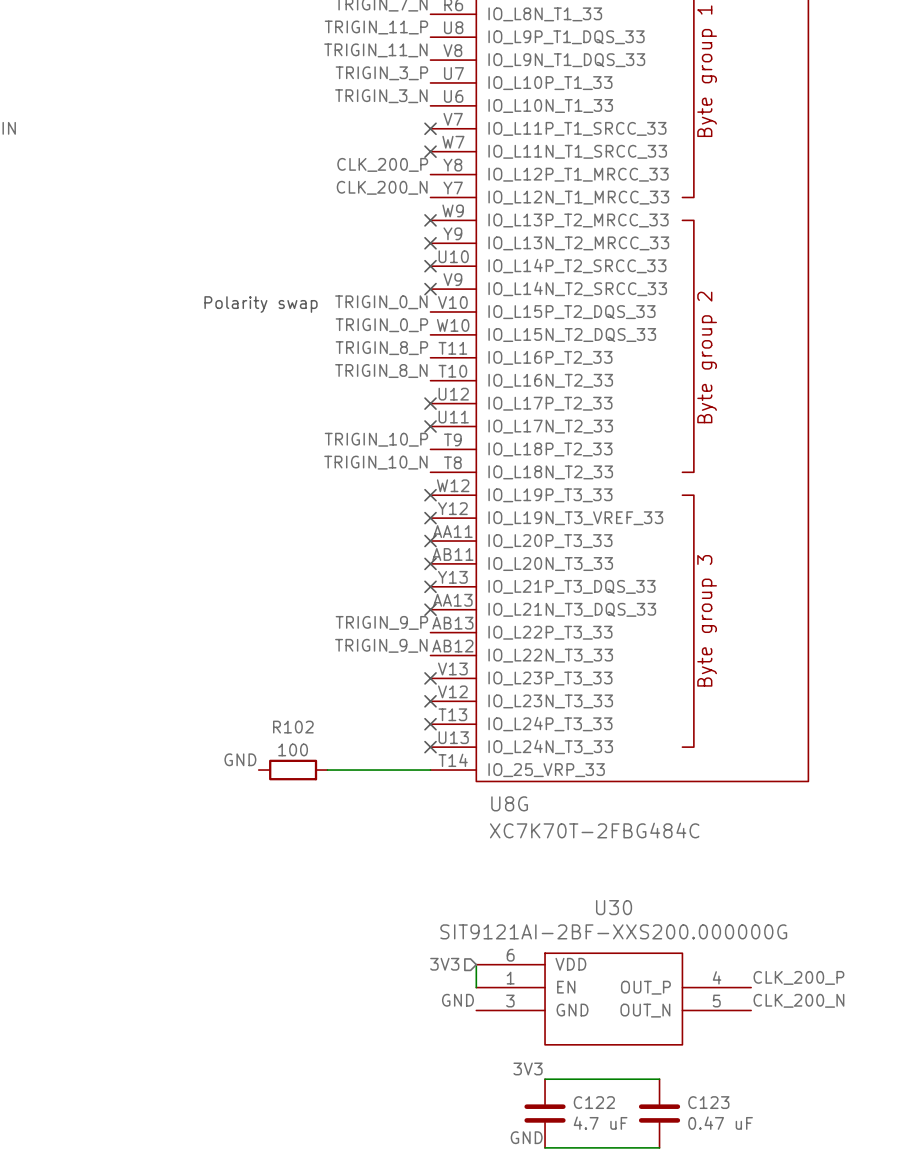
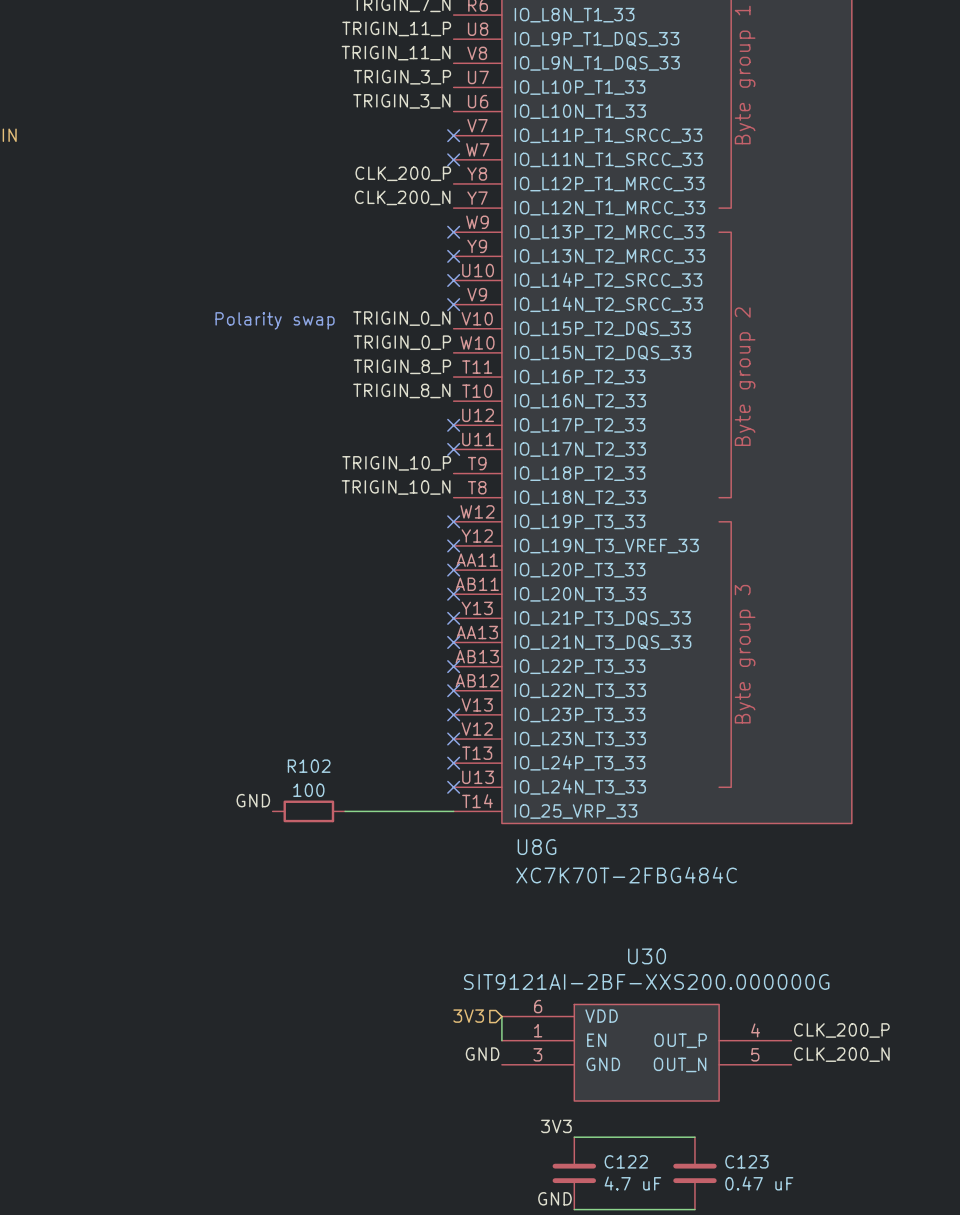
label: TRIGIN_9_P (381, 622) -> none
no-connect mark: none -> (453, 666)
label: TRIGIN_9_N (381, 645) -> none
no-connect mark: none -> (453, 690)

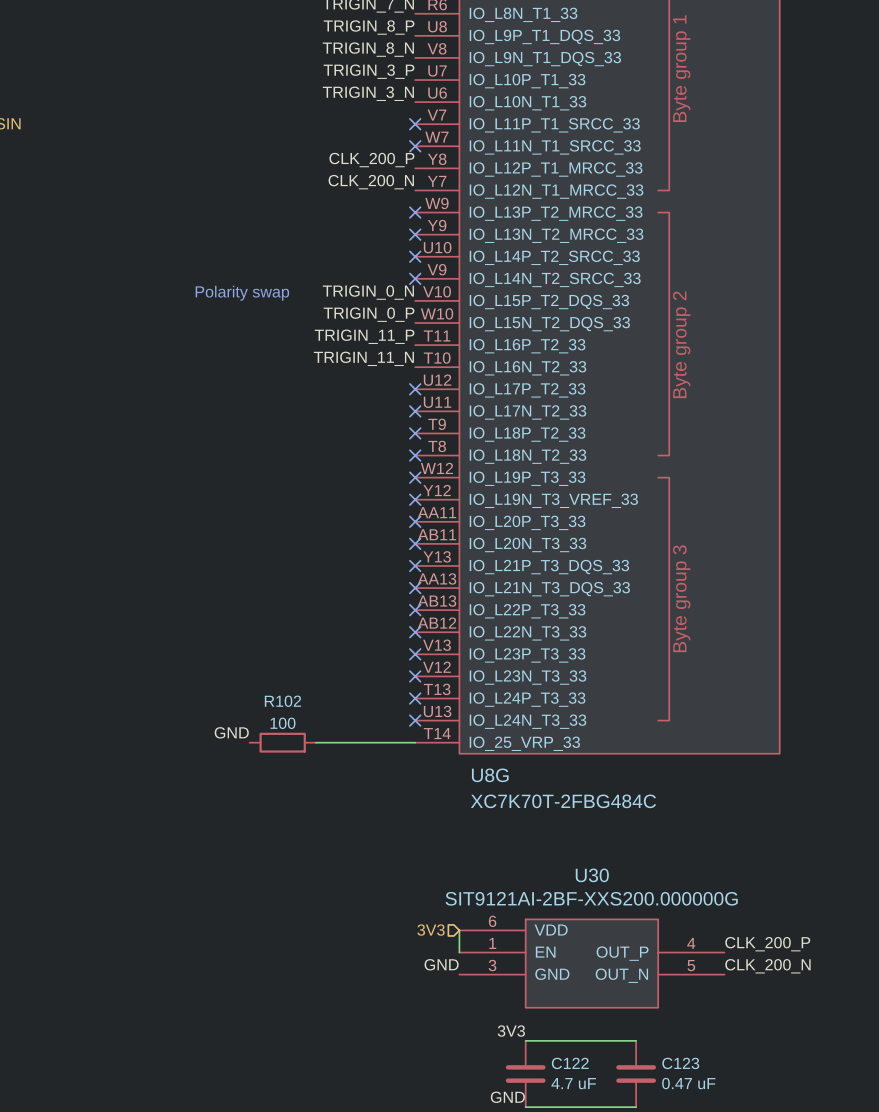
label: TRIGIN_11_P (396, 28) -> TRIGIN_8_P (369, 27)
label: TRIGIN_11_N (396, 53) -> TRIGIN_8_N (368, 49)
label: TRIGIN_8_P (402, 366) -> TRIGIN_11_P (364, 336)
label: TRIGIN_8_N (401, 390) -> TRIGIN_11_N (363, 358)
label: TRIGIN_10_P (396, 463) -> none
no-connect mark: none -> (415, 433)
label: TRIGIN_10_N (396, 487) -> none
no-connect mark: none -> (415, 455)

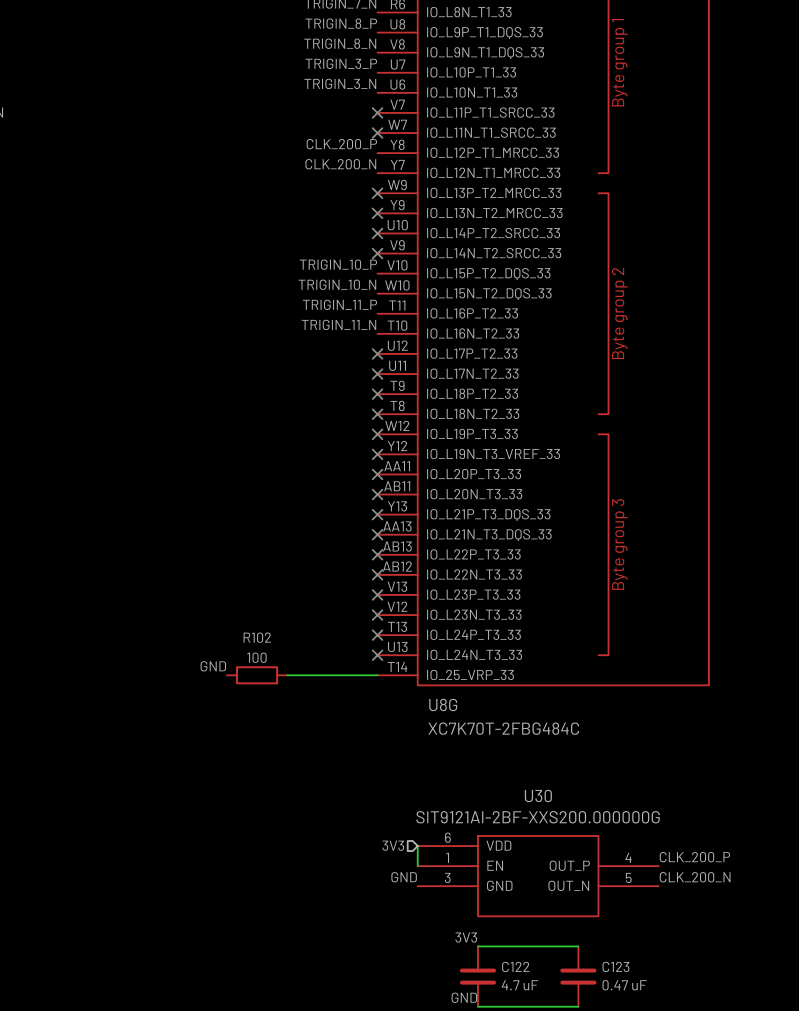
label: TRIGIN_0_N (368, 292) -> TRIGIN_10_P (338, 264)
text: Polarity swap (242, 293) -> none
label: TRIGIN_0_P (369, 314) -> TRIGIN_10_N (337, 284)

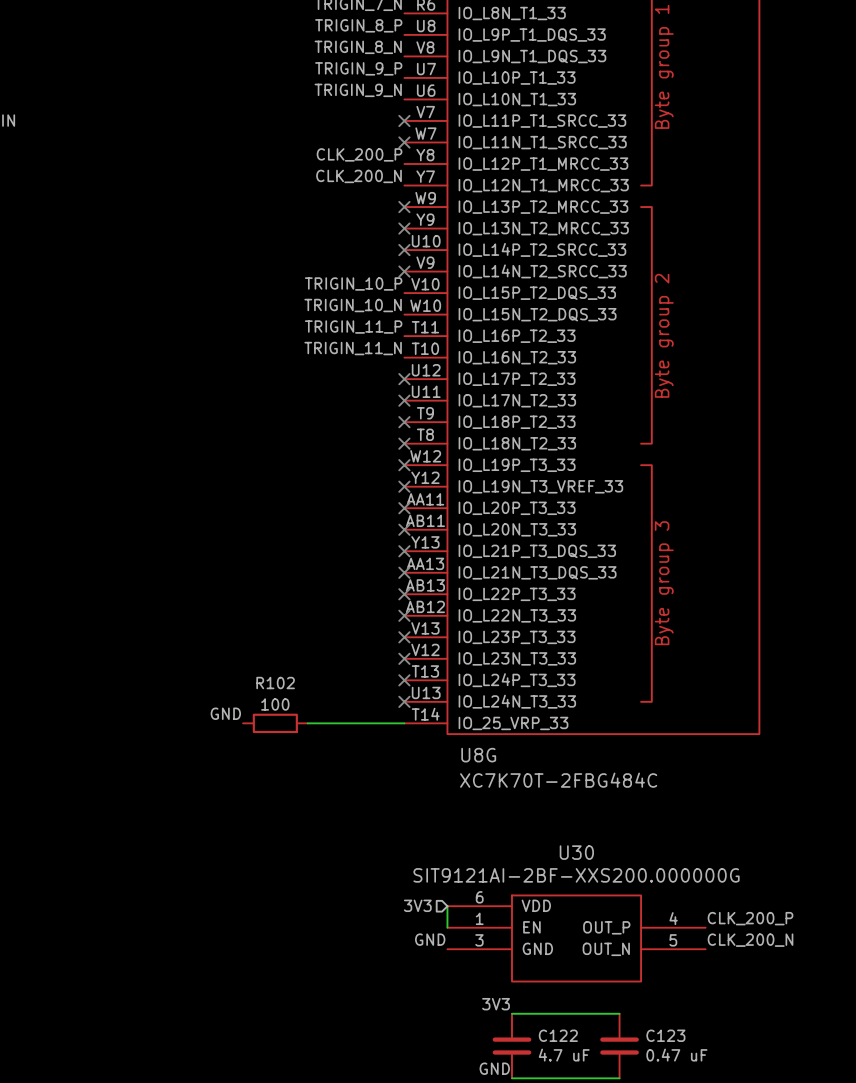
label: TRIGIN_3_P (341, 63) -> TRIGIN_9_P (358, 68)
label: TRIGIN_3_N (340, 83) -> TRIGIN_9_N (358, 90)

